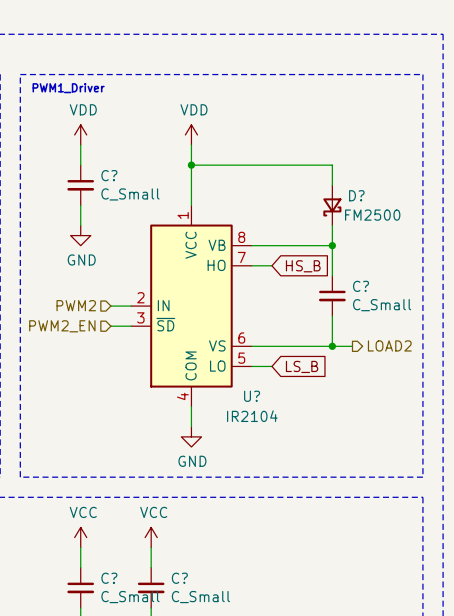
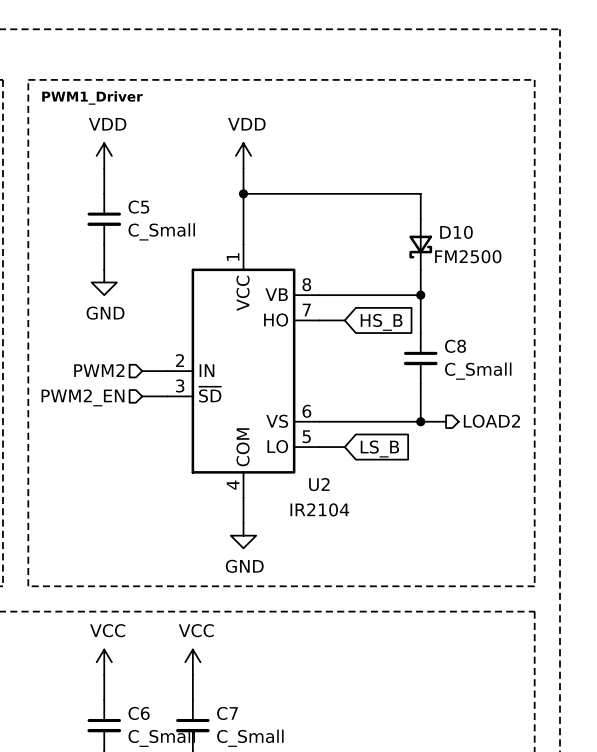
C? name: C? (109, 175) -> C5 (138, 207)
D? name: D? (356, 195) -> D10 (456, 232)
C? name: C? (361, 286) -> C8 (455, 346)
U? name: U? (252, 396) -> U2 (319, 484)
C? name: C? (109, 578) -> C6 (139, 713)
C? name: C? (179, 578) -> C7 (227, 713)

